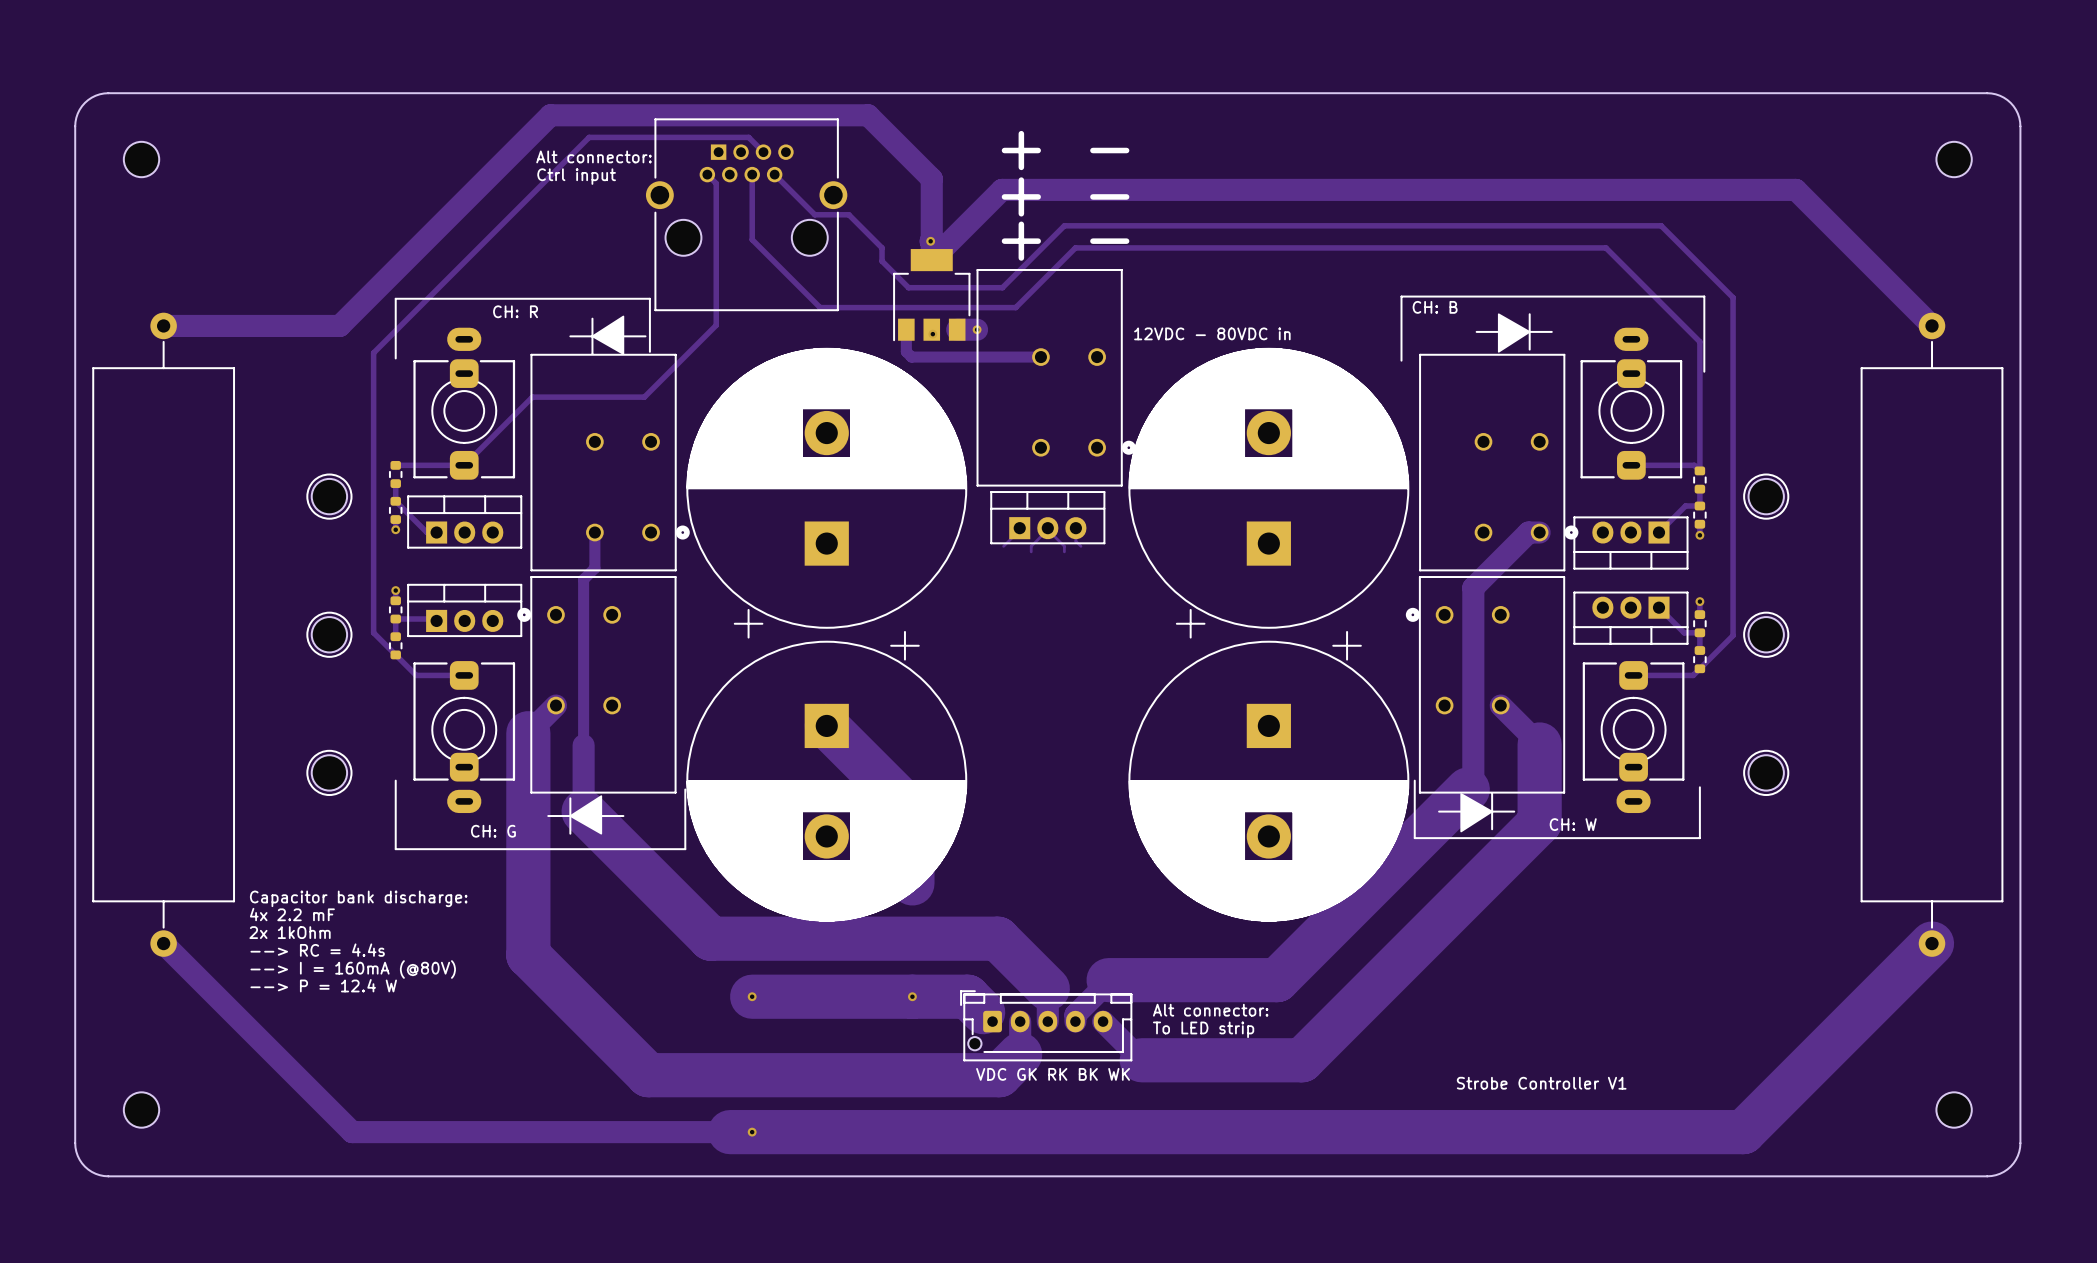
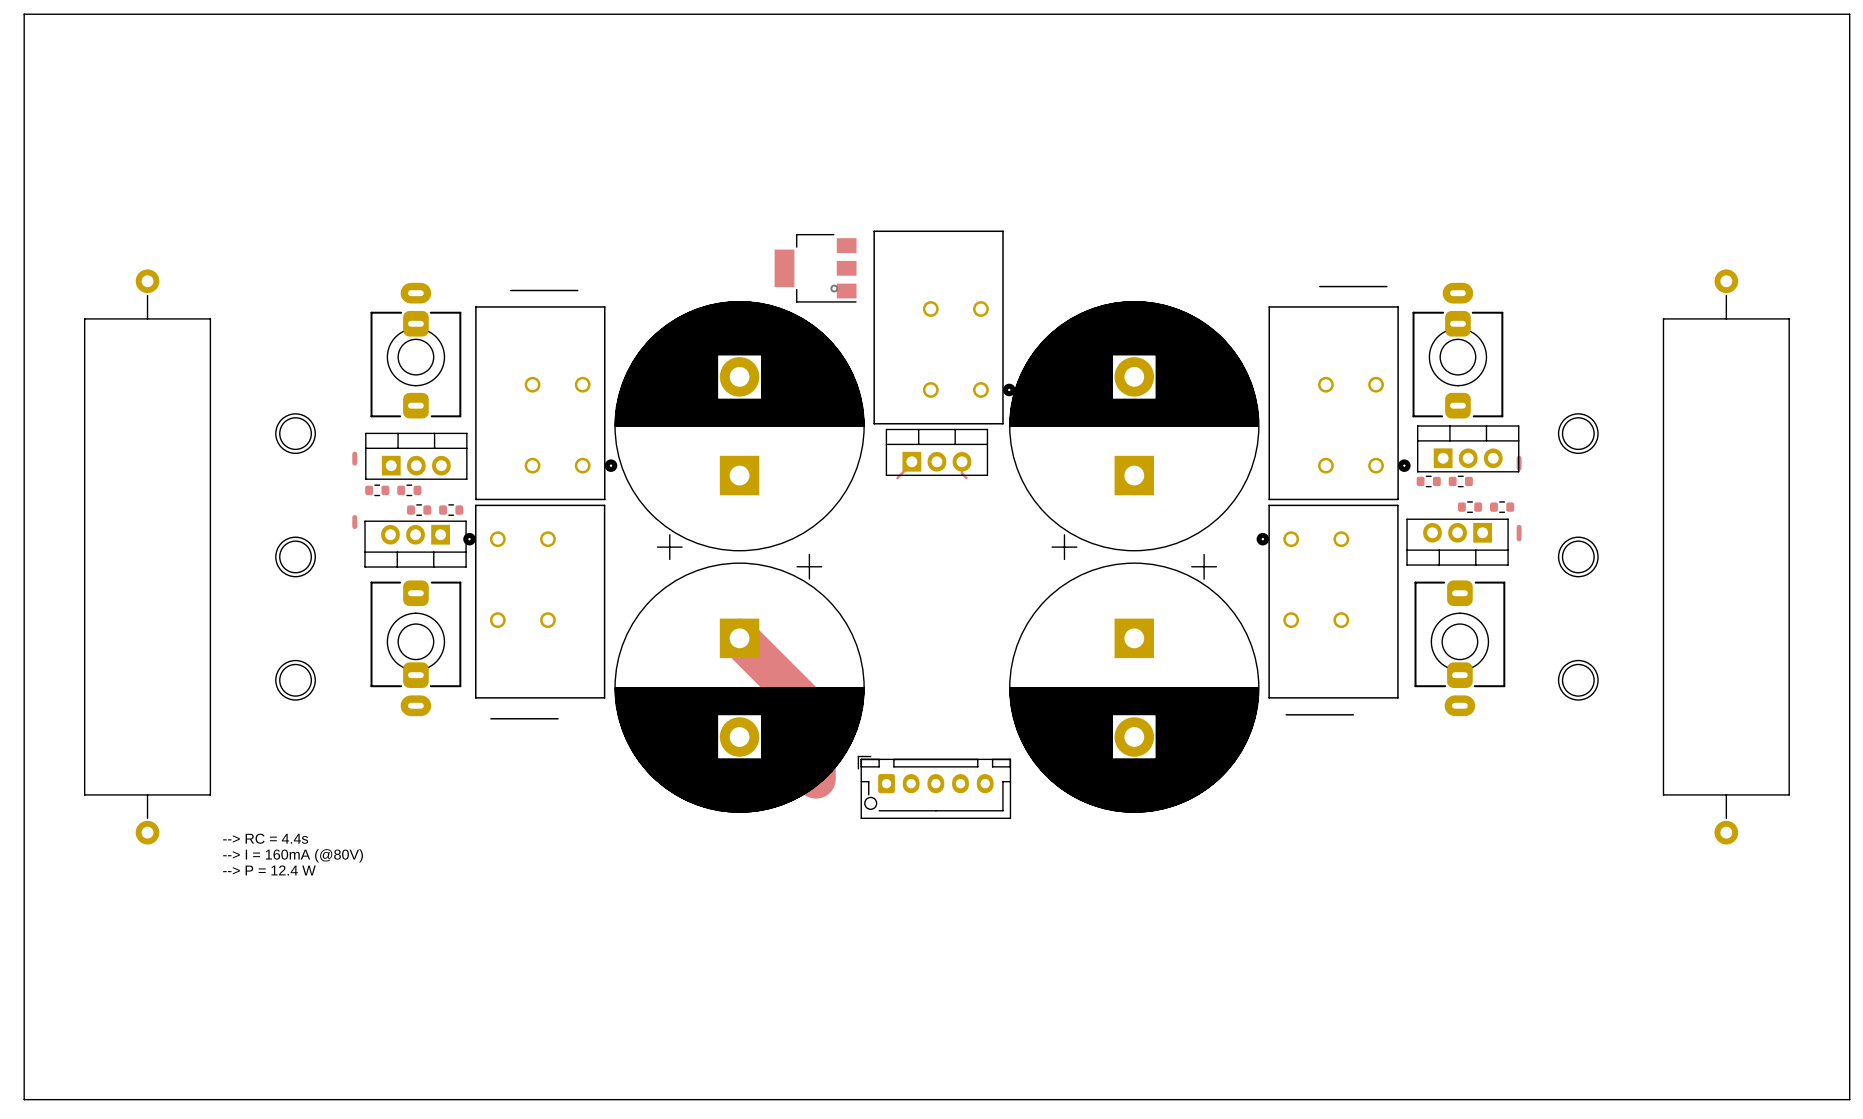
board edge: (108, 93) (1987, 93) (2003, 97) (2015, 109) (2020, 126) (2020, 1143) (2015, 1159) (2003, 1171) (1987, 1176) (108, 1176) (91, 1171) (79, 1159) (75, 1143) (75, 126) (77, 113) (84, 102) (95, 95) (108, 93) -> (24, 14) (24, 1099) (1849, 1099) (1849, 14) (24, 14)
text: + - (1065, 150) -> none
track: (763, 152) (748, 137) (589, 137) (373, 352) (373, 632) (416, 675) (464, 675) -> none
text: Alt connector: (593, 156) -> none
part: (141, 159) -> none
part: (1954, 159) -> none
track: (707, 174) (716, 183) (716, 325) (644, 397) (532, 397) (464, 465) (395, 465) -> none
track: (752, 174) (752, 239) (820, 307) (1015, 307) (1075, 247) (1605, 247) (1699, 341) (1699, 470) (1694, 465) (1631, 465) -> none
track: (774, 174) (814, 214) (848, 214) (882, 247) (882, 261) (908, 287) (1002, 287) (1064, 225) (1661, 225) (1733, 297) (1733, 635) (1693, 675) (1633, 675) -> none
text: Ctrl input (576, 176) -> none
text: + - (1065, 196) -> none
part: (746, 214) -> none
via: (930, 241) -> none
text: + - (1065, 241) -> none
part rotation: 0° (931, 294) -> 90° counterclockwise (815, 268)
text: CH: B (1435, 307) -> none
text: CH: R (515, 311) -> none
drawing: [1497, 313, 1531, 353] -> none
line: (1529, 314) (1529, 349) -> none
drawing: [591, 315, 625, 355] -> none
line: (592, 318) (592, 354) -> none
track: (163, 325) (339, 325) (550, 115) (868, 115) (931, 178) (931, 260) (1001, 189) (1795, 189) (1932, 325) -> none
track: (906, 329) (906, 351) (911, 357) (1040, 357) -> none
track: (957, 329) (977, 329) -> none
via: (977, 329) -> none
text: 12VDC - 80VDC in (1212, 333) -> none
line: (649, 351) (649, 298) (395, 298) (395, 358) -> none
line: (1401, 360) (1401, 296) (1704, 296) (1704, 371) -> none
part: (395, 474) -> none
part: (1699, 480) -> none
track: (395, 483) (395, 501) (426, 532) (436, 532) -> none
track: (1699, 489) (1699, 506) (1685, 506) (1659, 532) -> none
part: (395, 510) -> none
part: none -> (1468, 448)
part: (1699, 515) -> none
part footprint: [1573, 516, 1689, 570] -> [1448, 475, 1473, 488]
via: (395, 529) -> none
track: (594, 532) (594, 568) (583, 579) (583, 795) -> none
track: (1539, 532) (1528, 532) (1473, 587) (1473, 783) (1277, 980) (1108, 980) (1075, 1014) (1075, 1021) -> none
via: (1699, 535) -> none
part: none -> (1428, 481)
track: (1031, 551) (1031, 546) (1047, 529) (1064, 546) (1064, 551) -> none
part: none -> (377, 490)
part: none -> (409, 490)
part: none -> (1470, 507)
part: none -> (1502, 507)
part: none -> (419, 510)
part: none -> (451, 510)
via: (395, 590) -> none
via: (1699, 601) -> none
track: (1659, 607) (1684, 632) (1699, 632) (1699, 650) -> none
part: (395, 609) -> none
part rotation: 0° (464, 610) -> 180° (415, 544)
track: (434, 619) (395, 619) (395, 636) -> none
part: (1699, 623) -> none
part: (395, 645) -> none
part: (1699, 659) -> none
track: (555, 705) (528, 733) (528, 955) (648, 1075) (999, 1075) (1020, 1054) (1020, 1021) -> none
track: (1500, 705) (1539, 744) (1539, 822) (1302, 1060) (1141, 1060) (1103, 1021) -> none
track: (583, 745) (583, 811) (710, 938) (997, 938) (1047, 988) (1047, 1021) -> none
line: (395, 780) (395, 849) (685, 849) (685, 789) -> none
line: (1414, 780) (1414, 838) (1699, 838) (1699, 787) -> none
drawing: [1460, 793, 1493, 833] -> none
line: (1492, 793) (1492, 829) -> none
drawing: [569, 795, 603, 835] -> none
line: (570, 798) (570, 833) -> none
text: CH: W (1573, 824) -> none
text: CH: G (493, 831) -> none
text: Capacitor bank discharge: (358, 898) -> none
text: 4x 2.2 mF (292, 914) -> none
text: 2x 1kOhm (290, 932) -> none
track: (163, 943) (352, 1132) (752, 1132) -> none
track: (1932, 943) (1743, 1132) (730, 1132) -> none
track: (752, 996) (967, 996) (983, 1012) -> none
via: (752, 996) -> none
via: (912, 996) -> none
text: Alt connector: (1210, 1010) -> none
part position: (1046, 1025) -> (934, 787)
text: To LED strip (1203, 1029) -> none
text: VDC GK RK BK WK (1053, 1074) -> none
text: Strobe Controller V1 (1541, 1083) -> none
part: (141, 1110) -> none
part: (1954, 1110) -> none
via: (752, 1132) -> none

